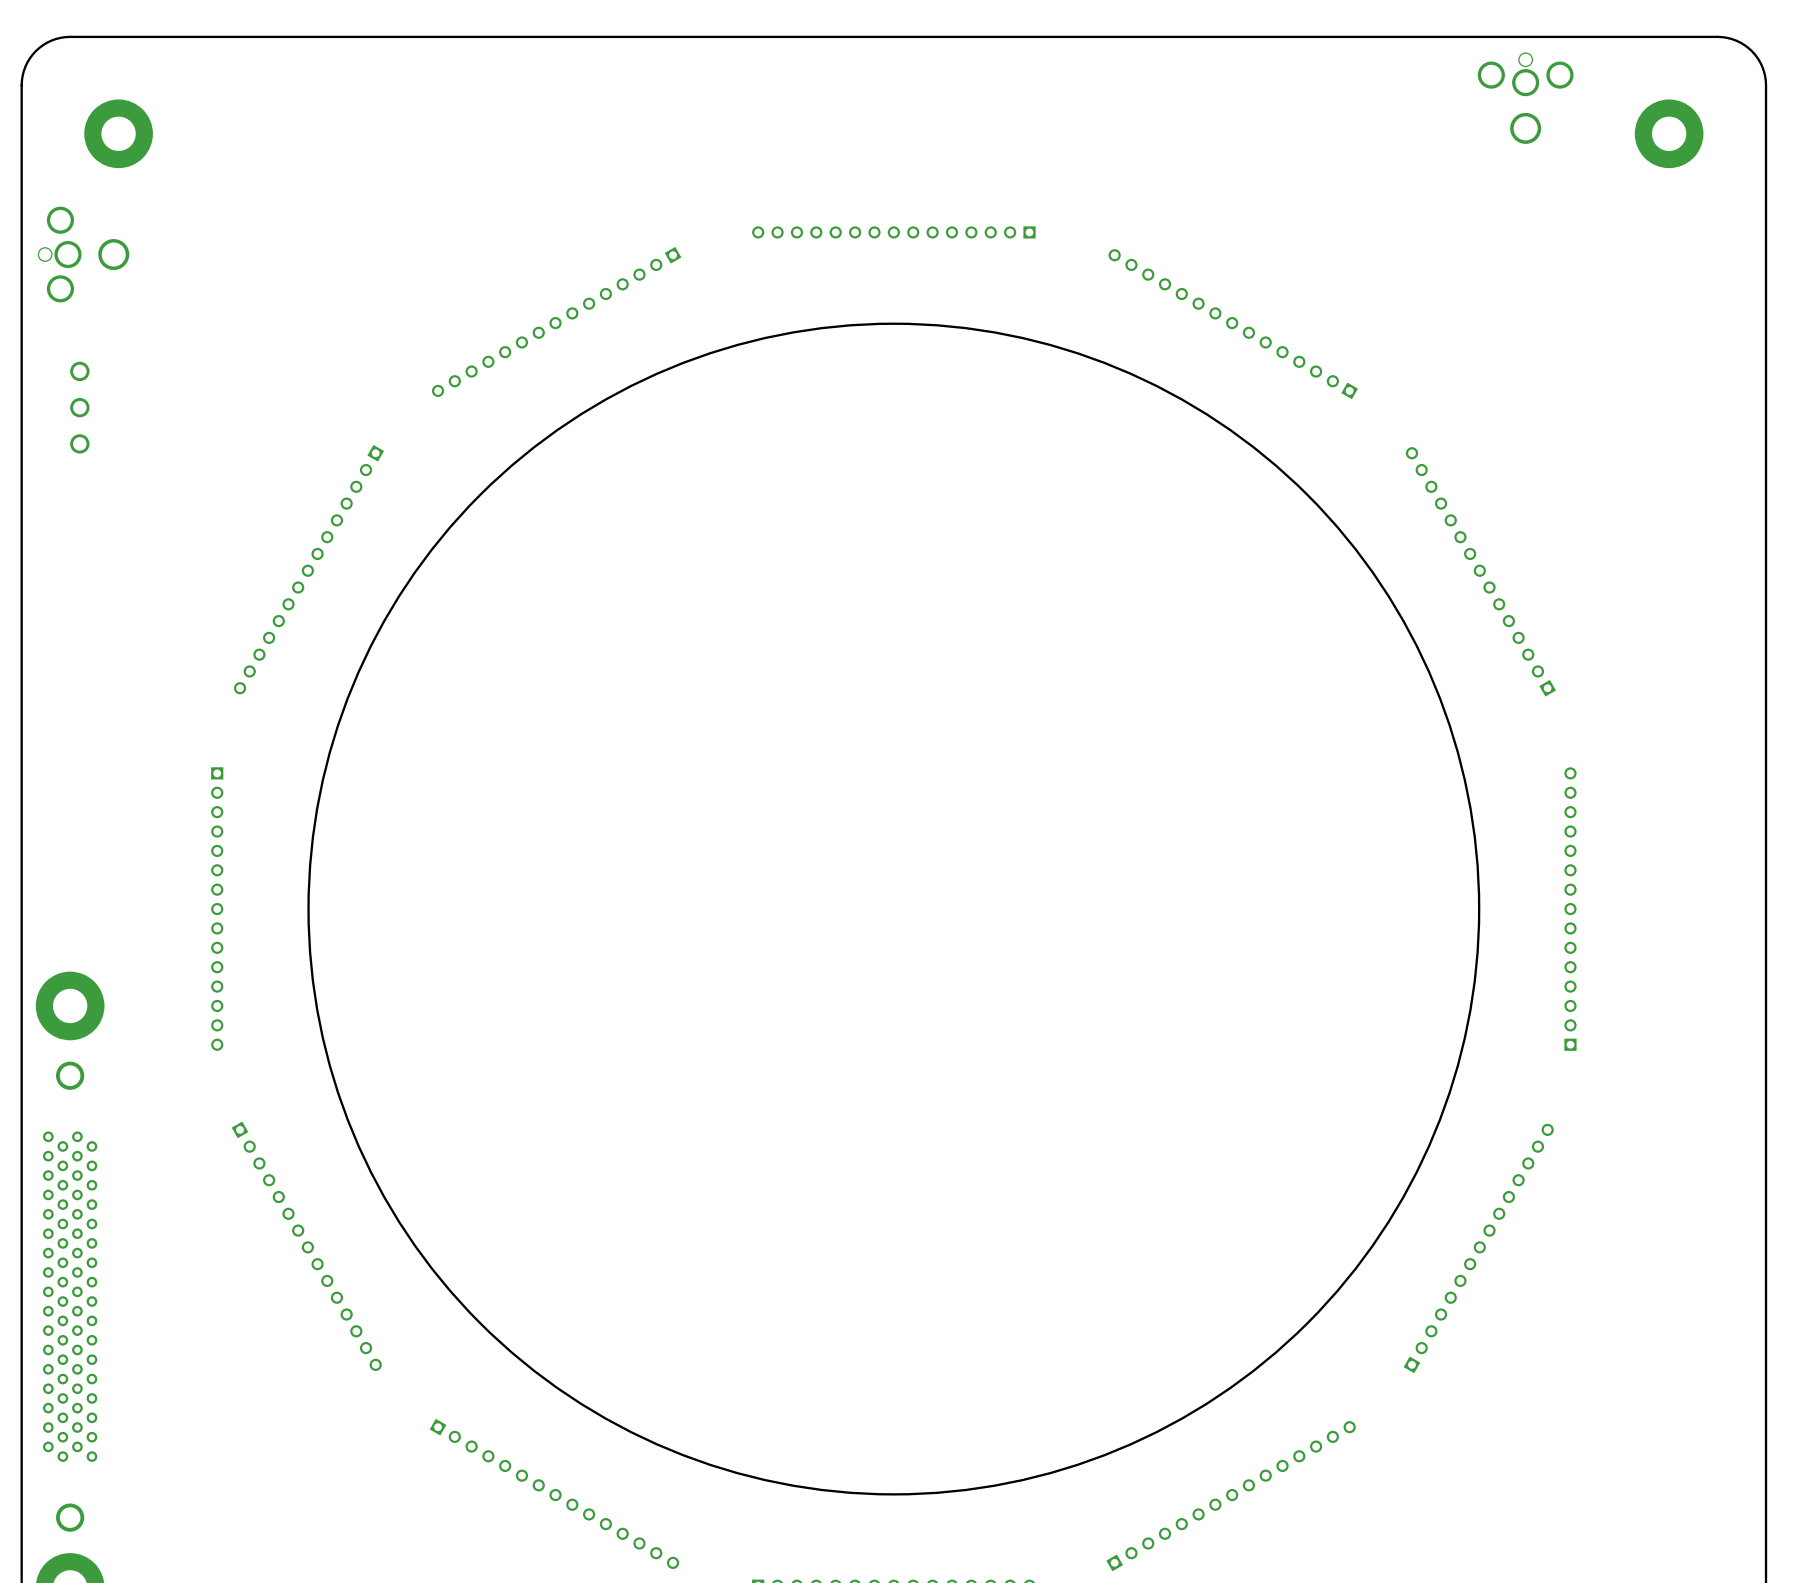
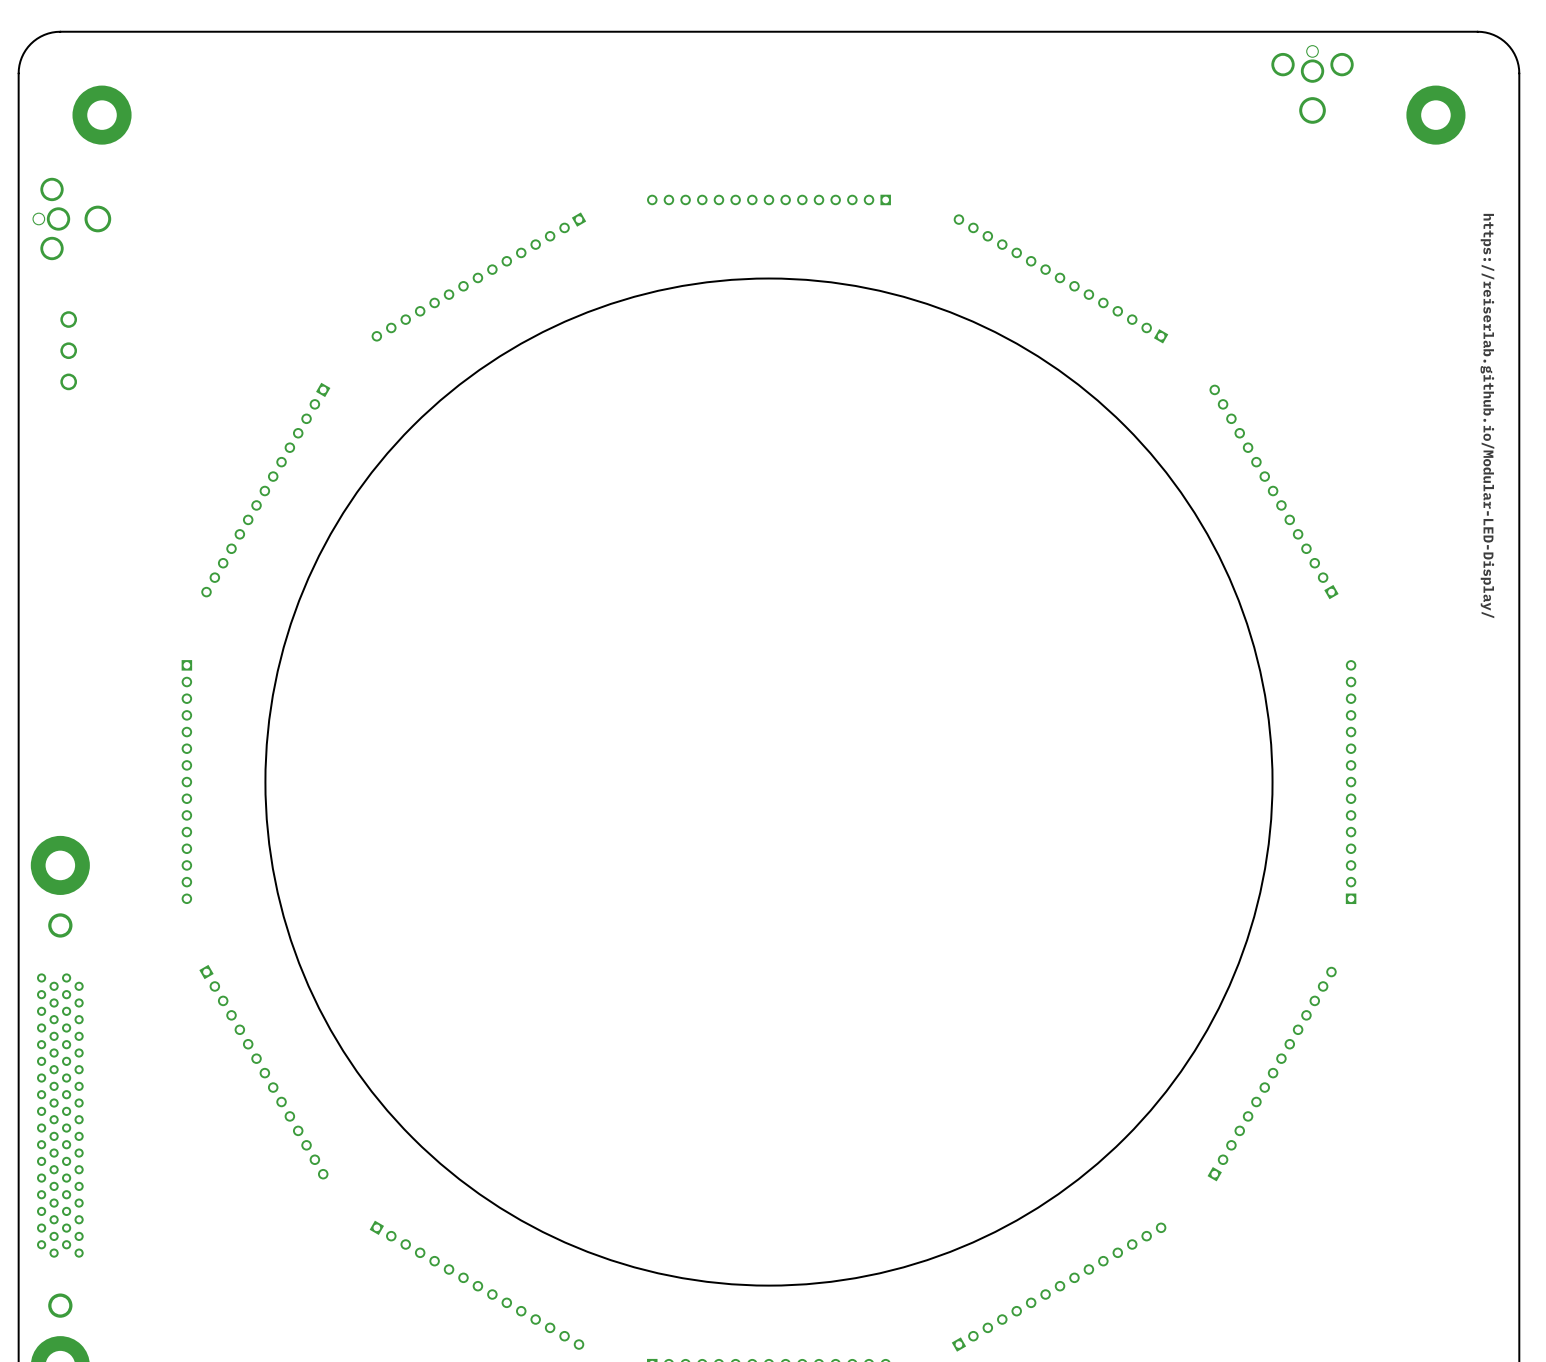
text: none -> https://reiserlab.github.io/Modular-LED-Display/ (1487, 416)

